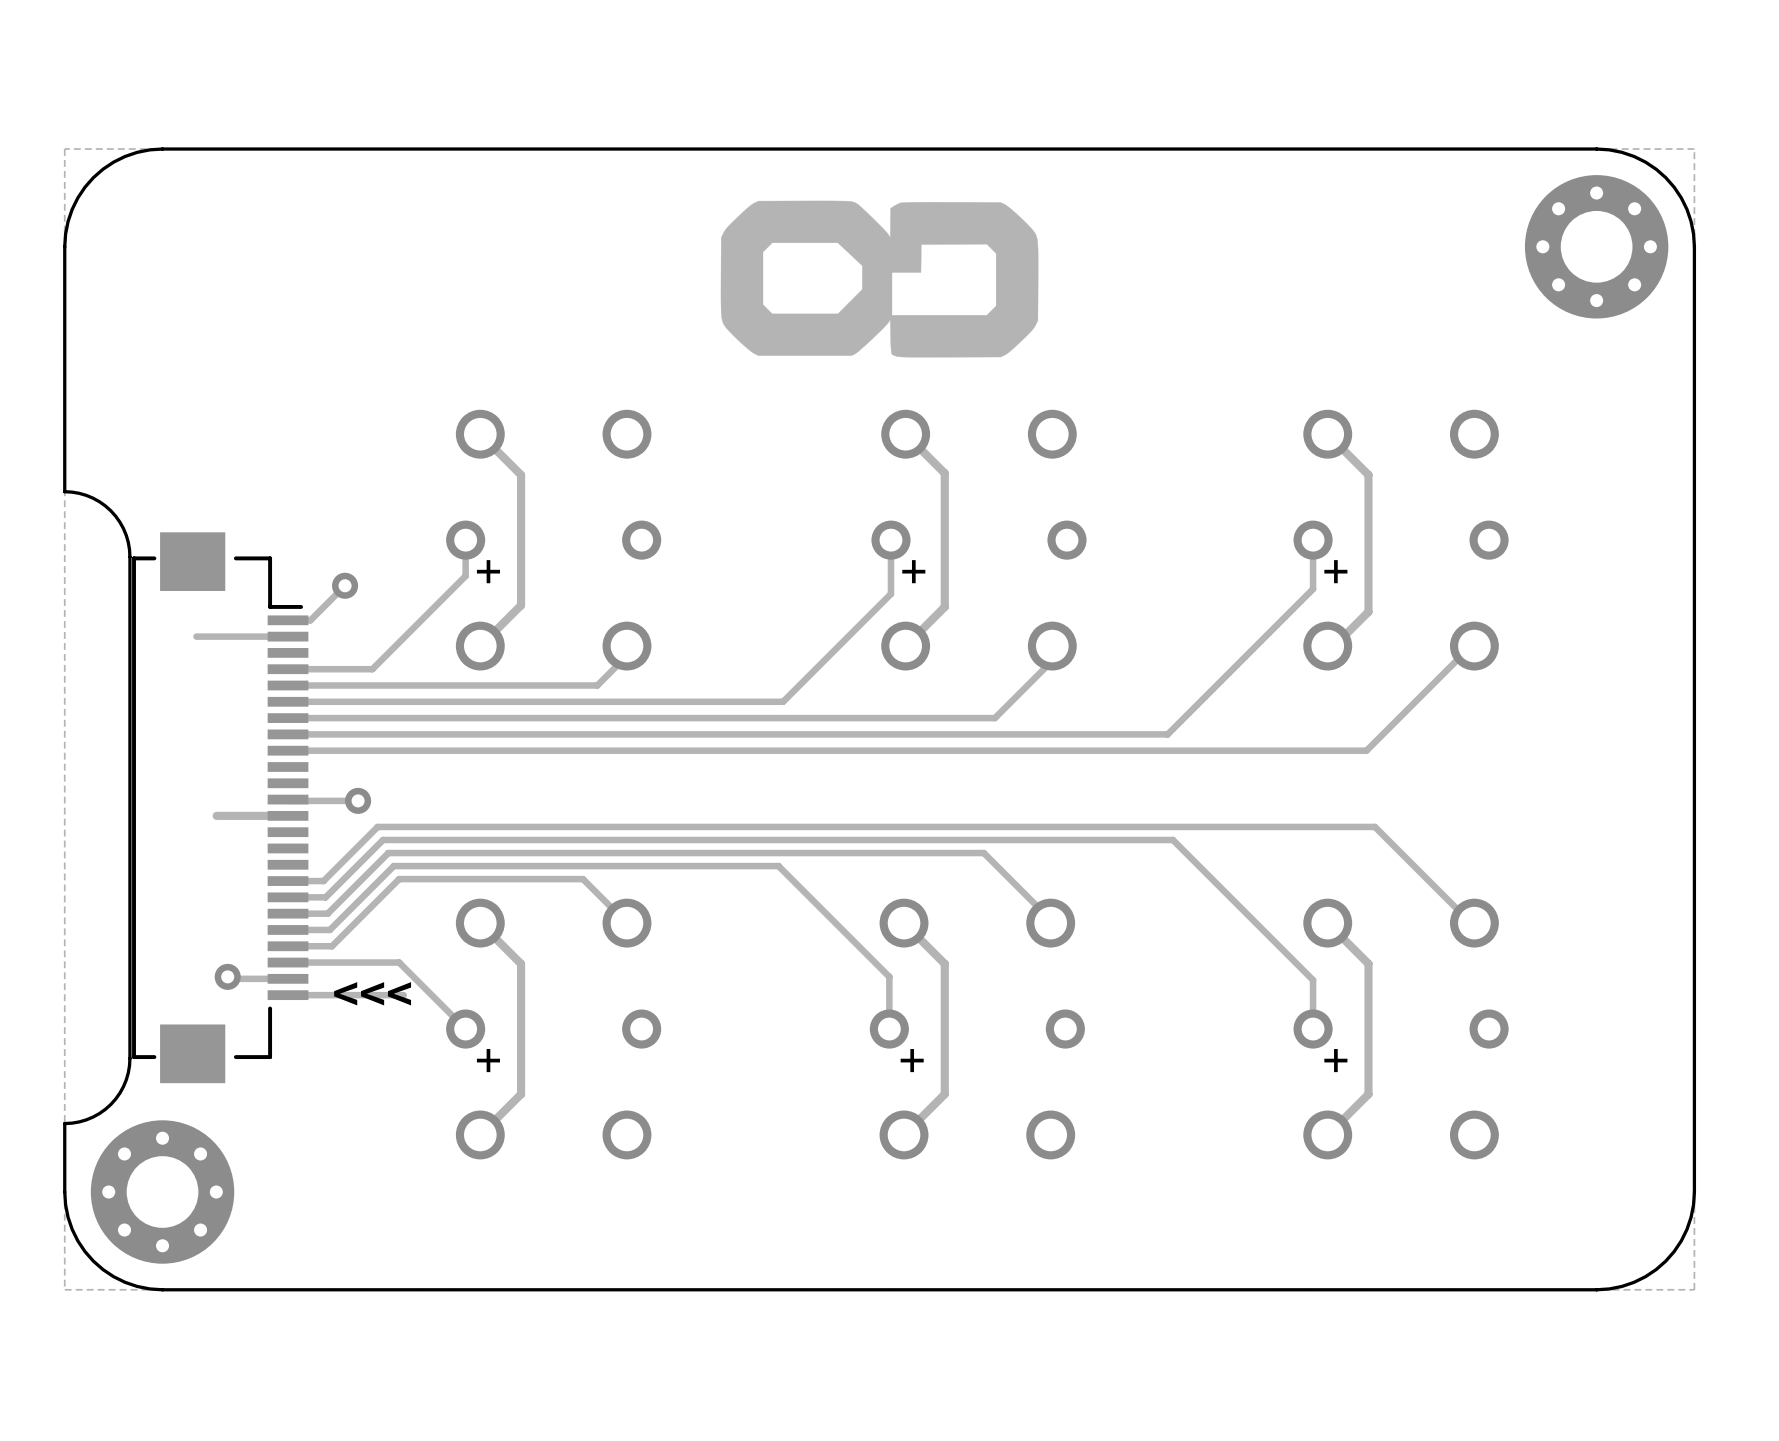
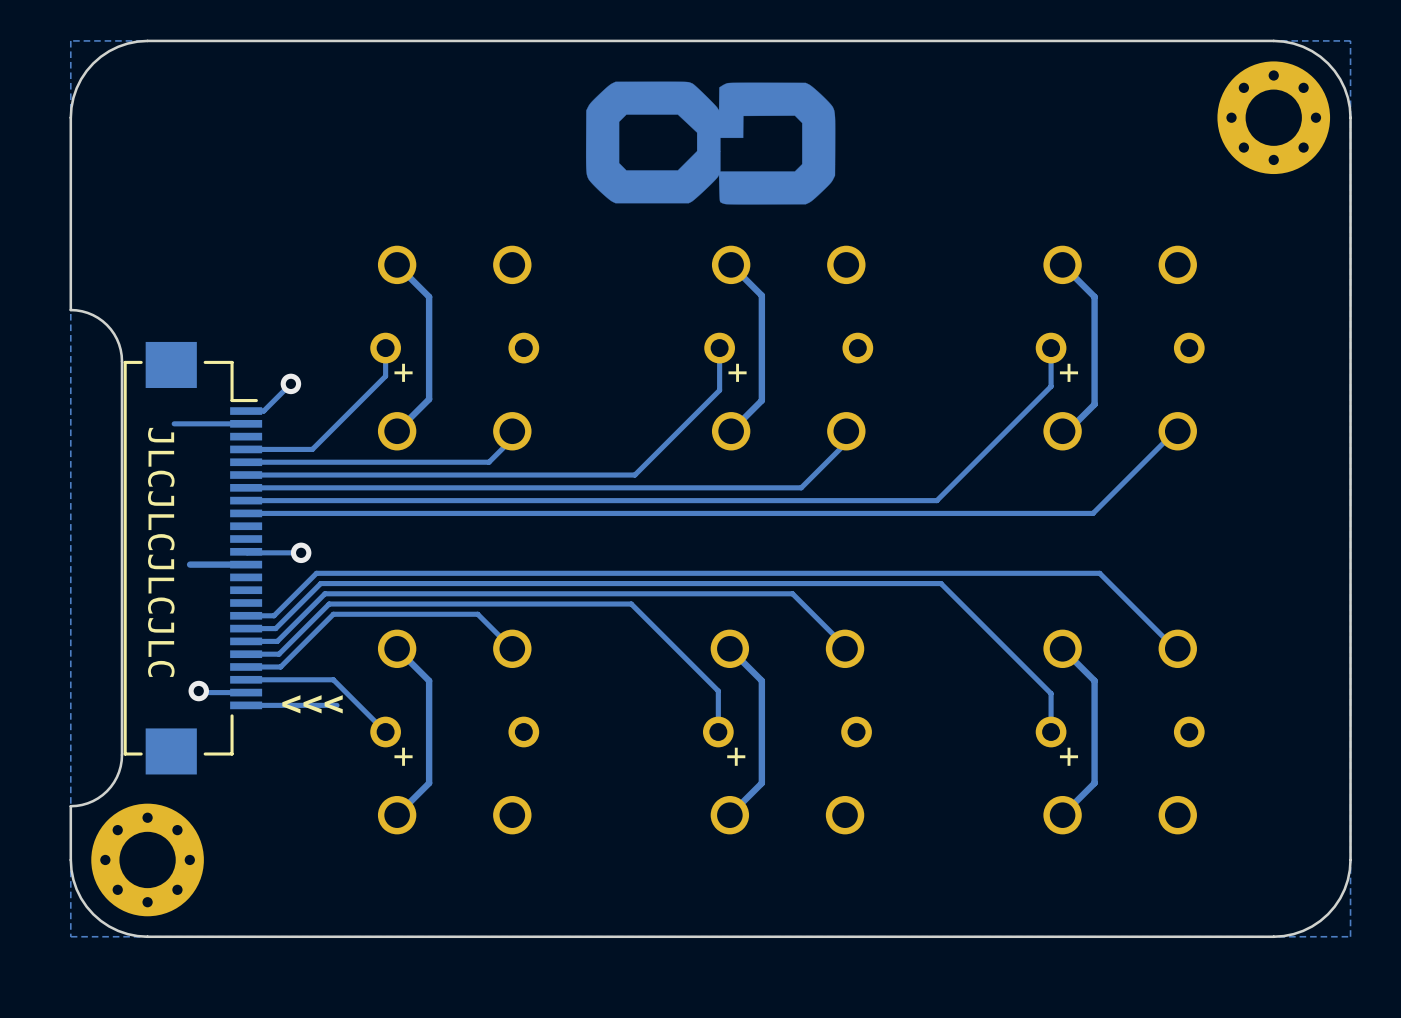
text: none -> JLCJLCJLCJLC (161, 552)

